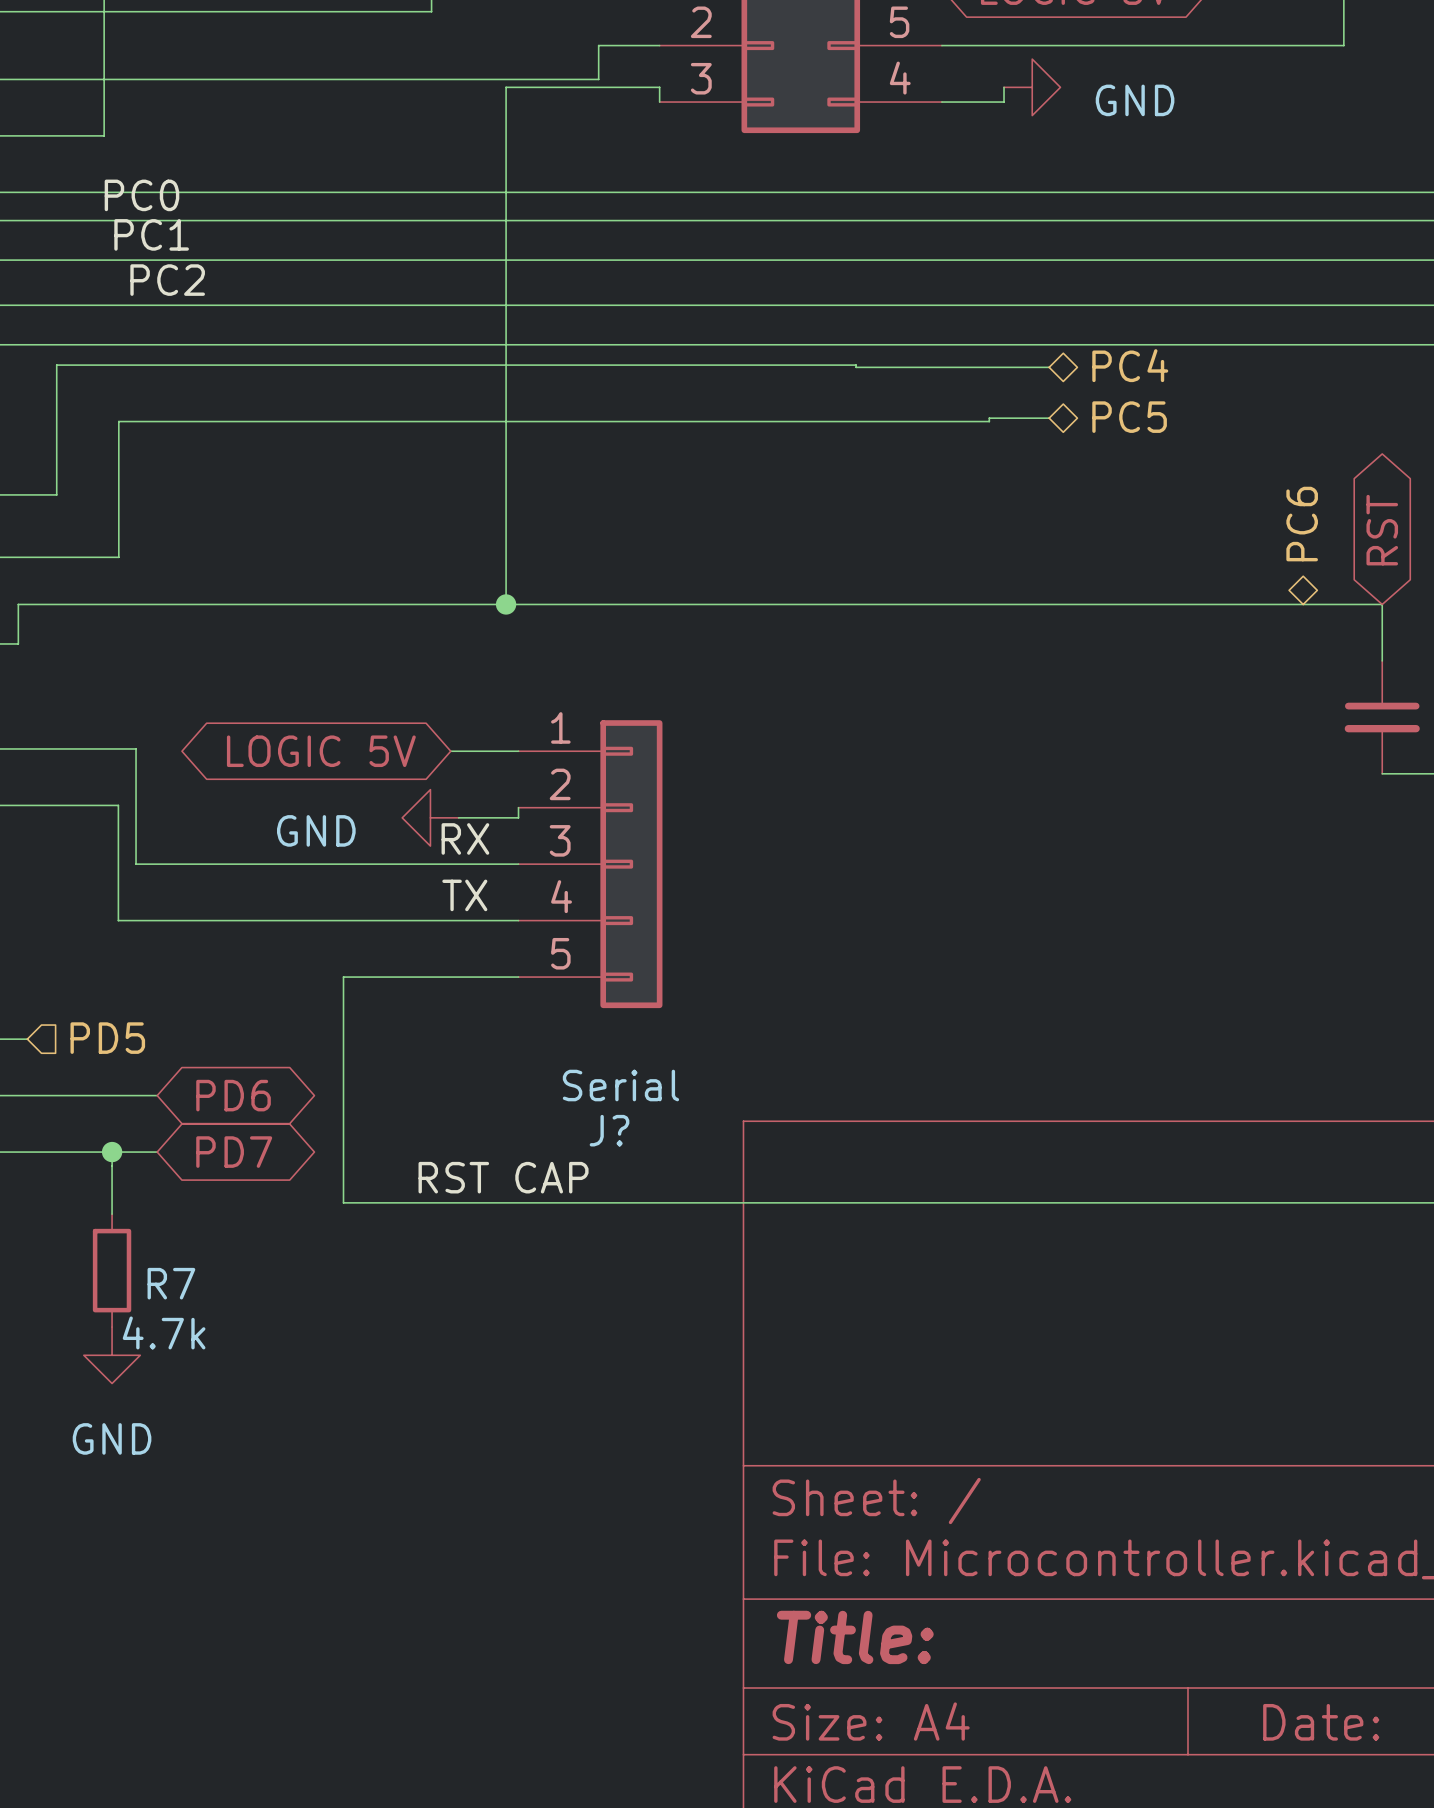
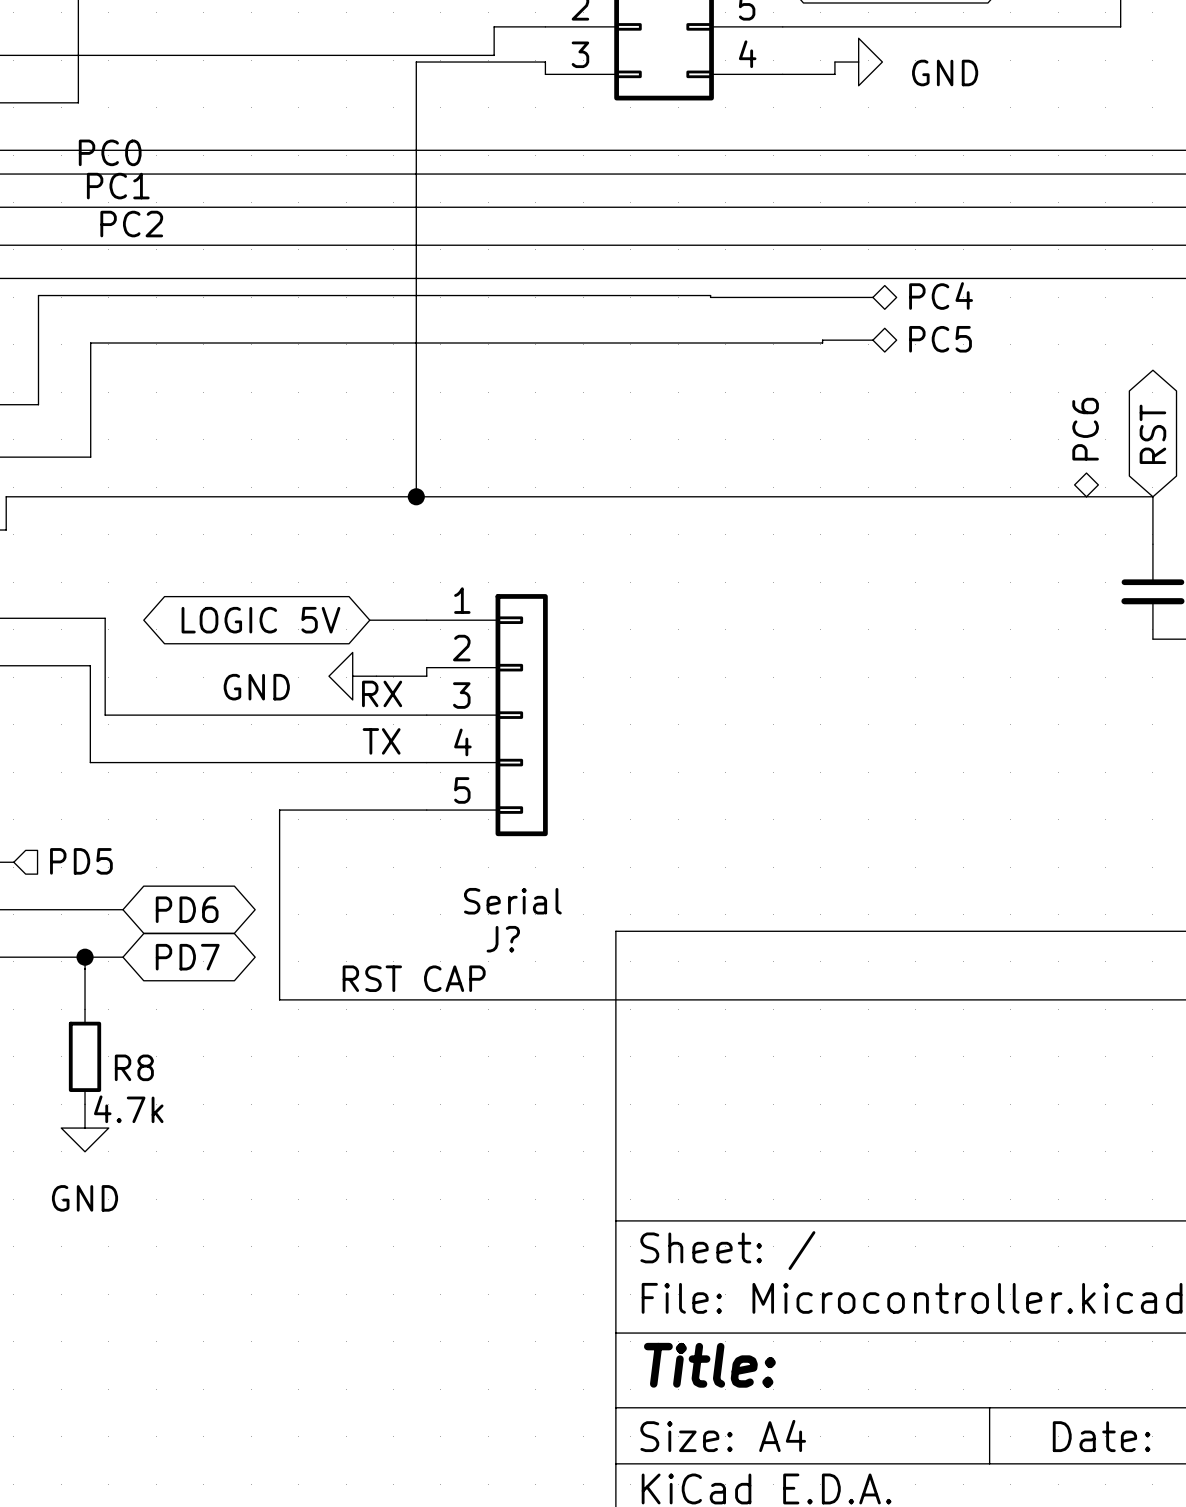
R7 name: R7 (171, 1283) -> R8 (134, 1067)

